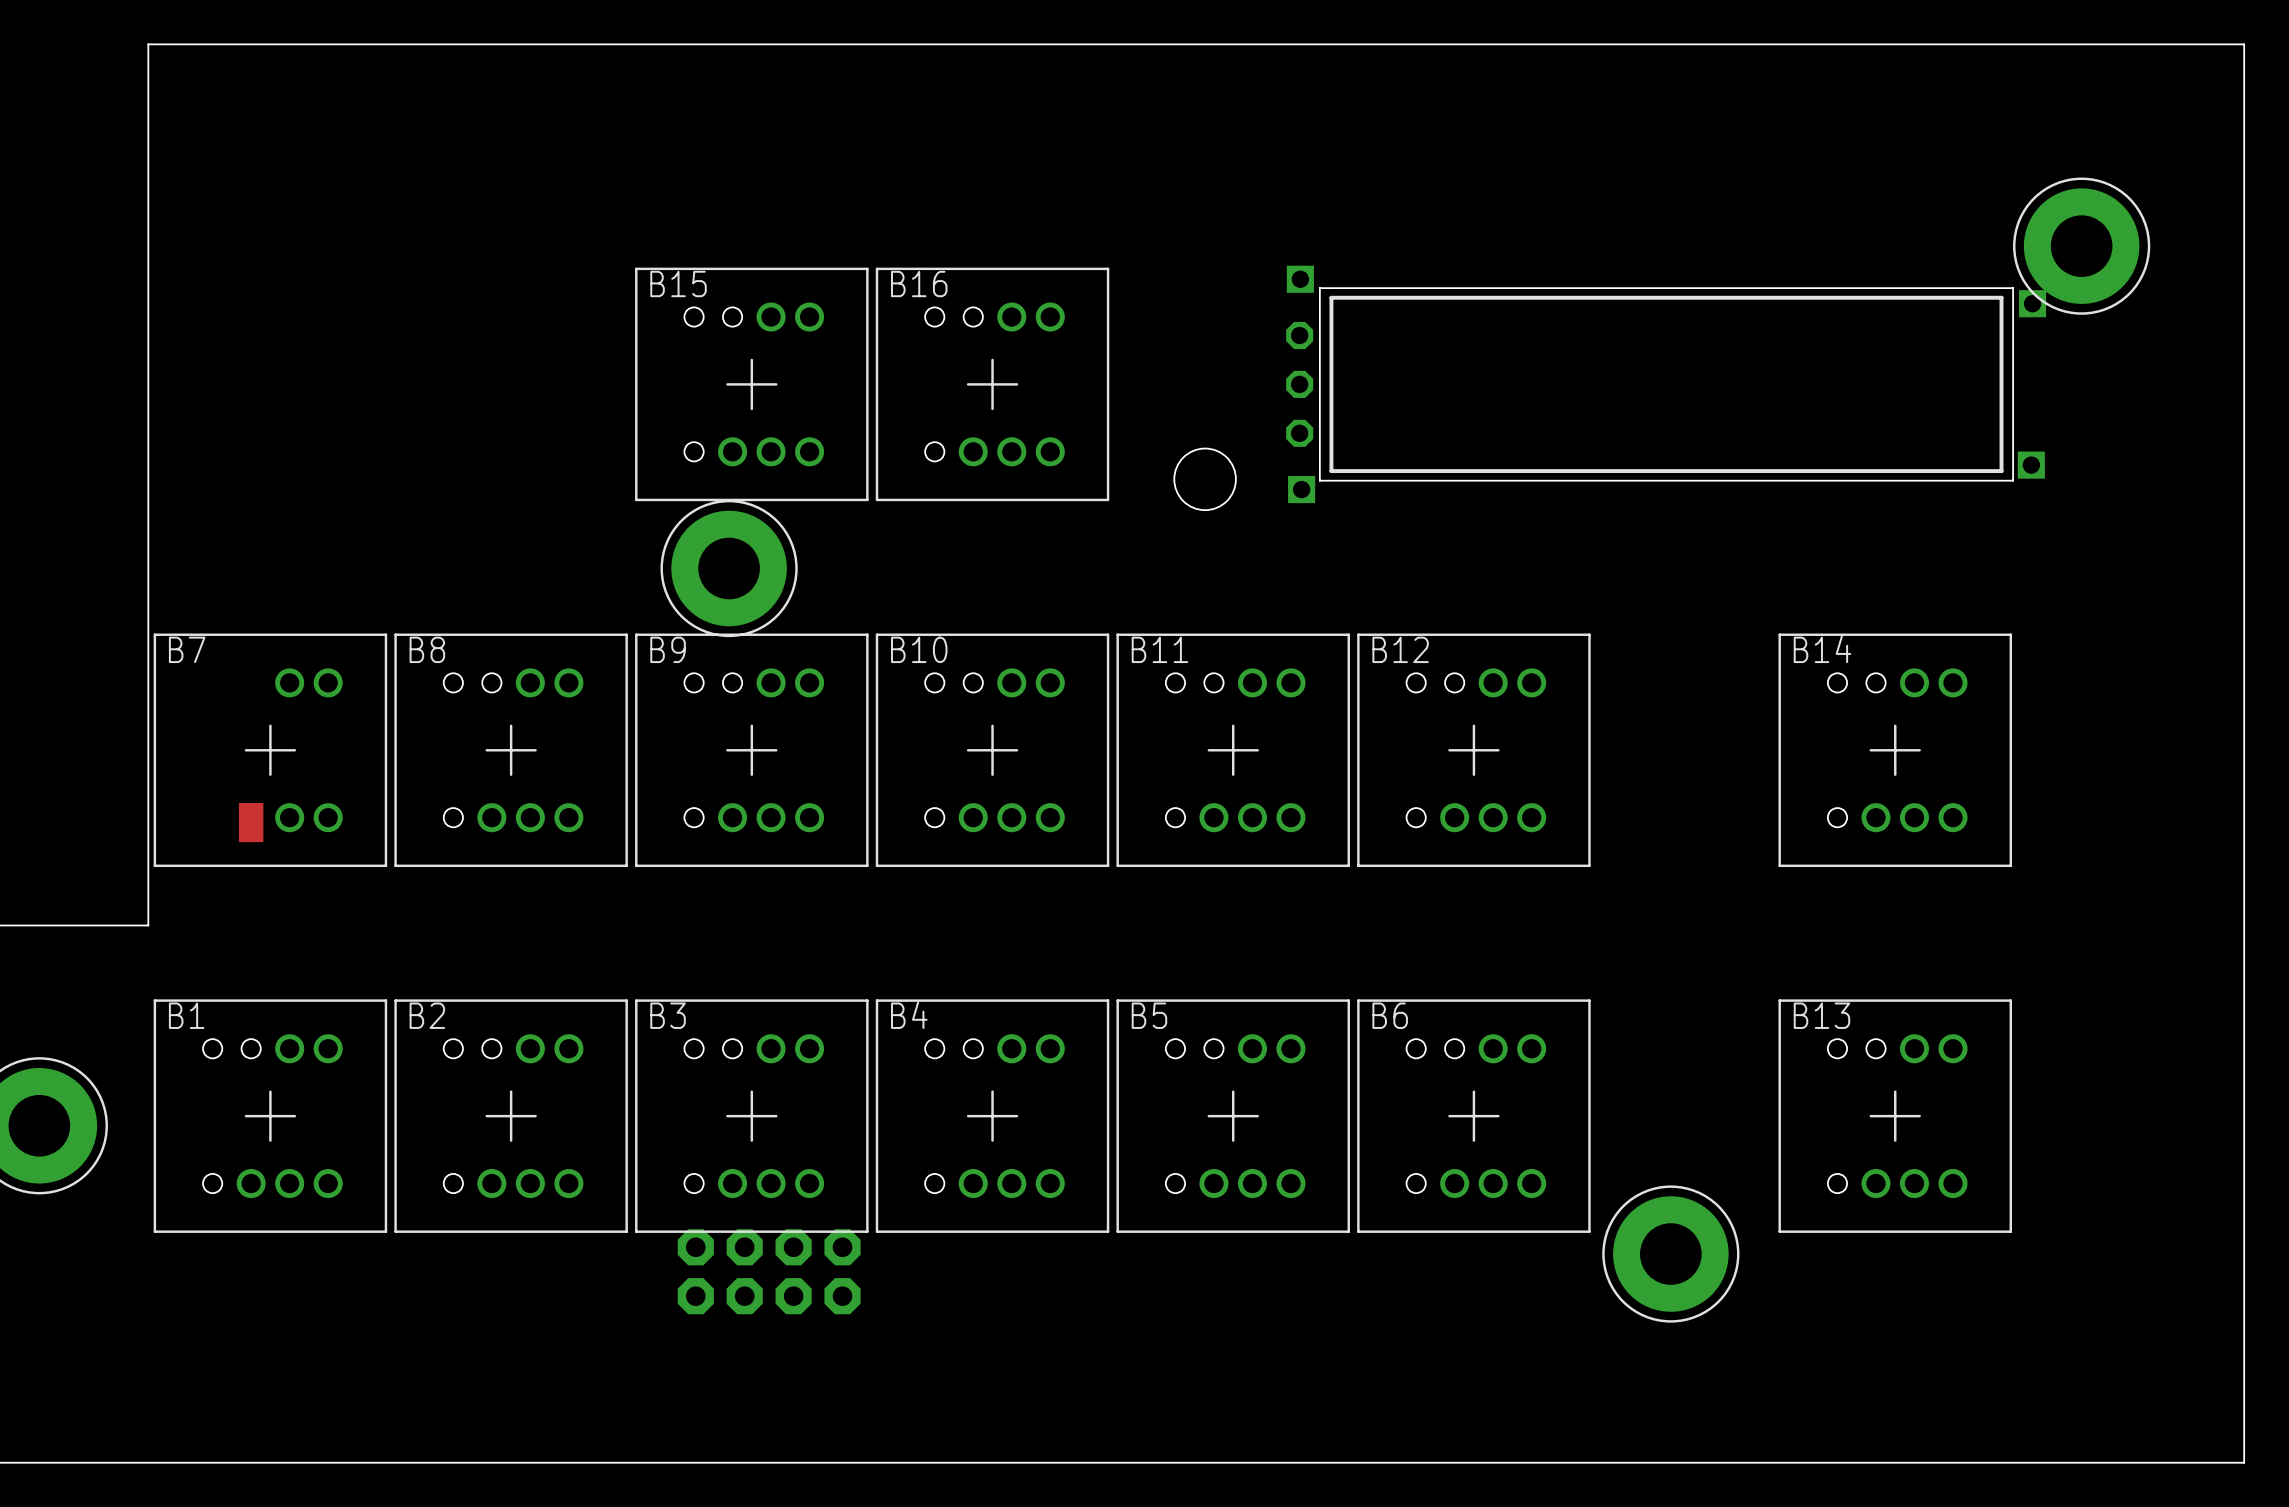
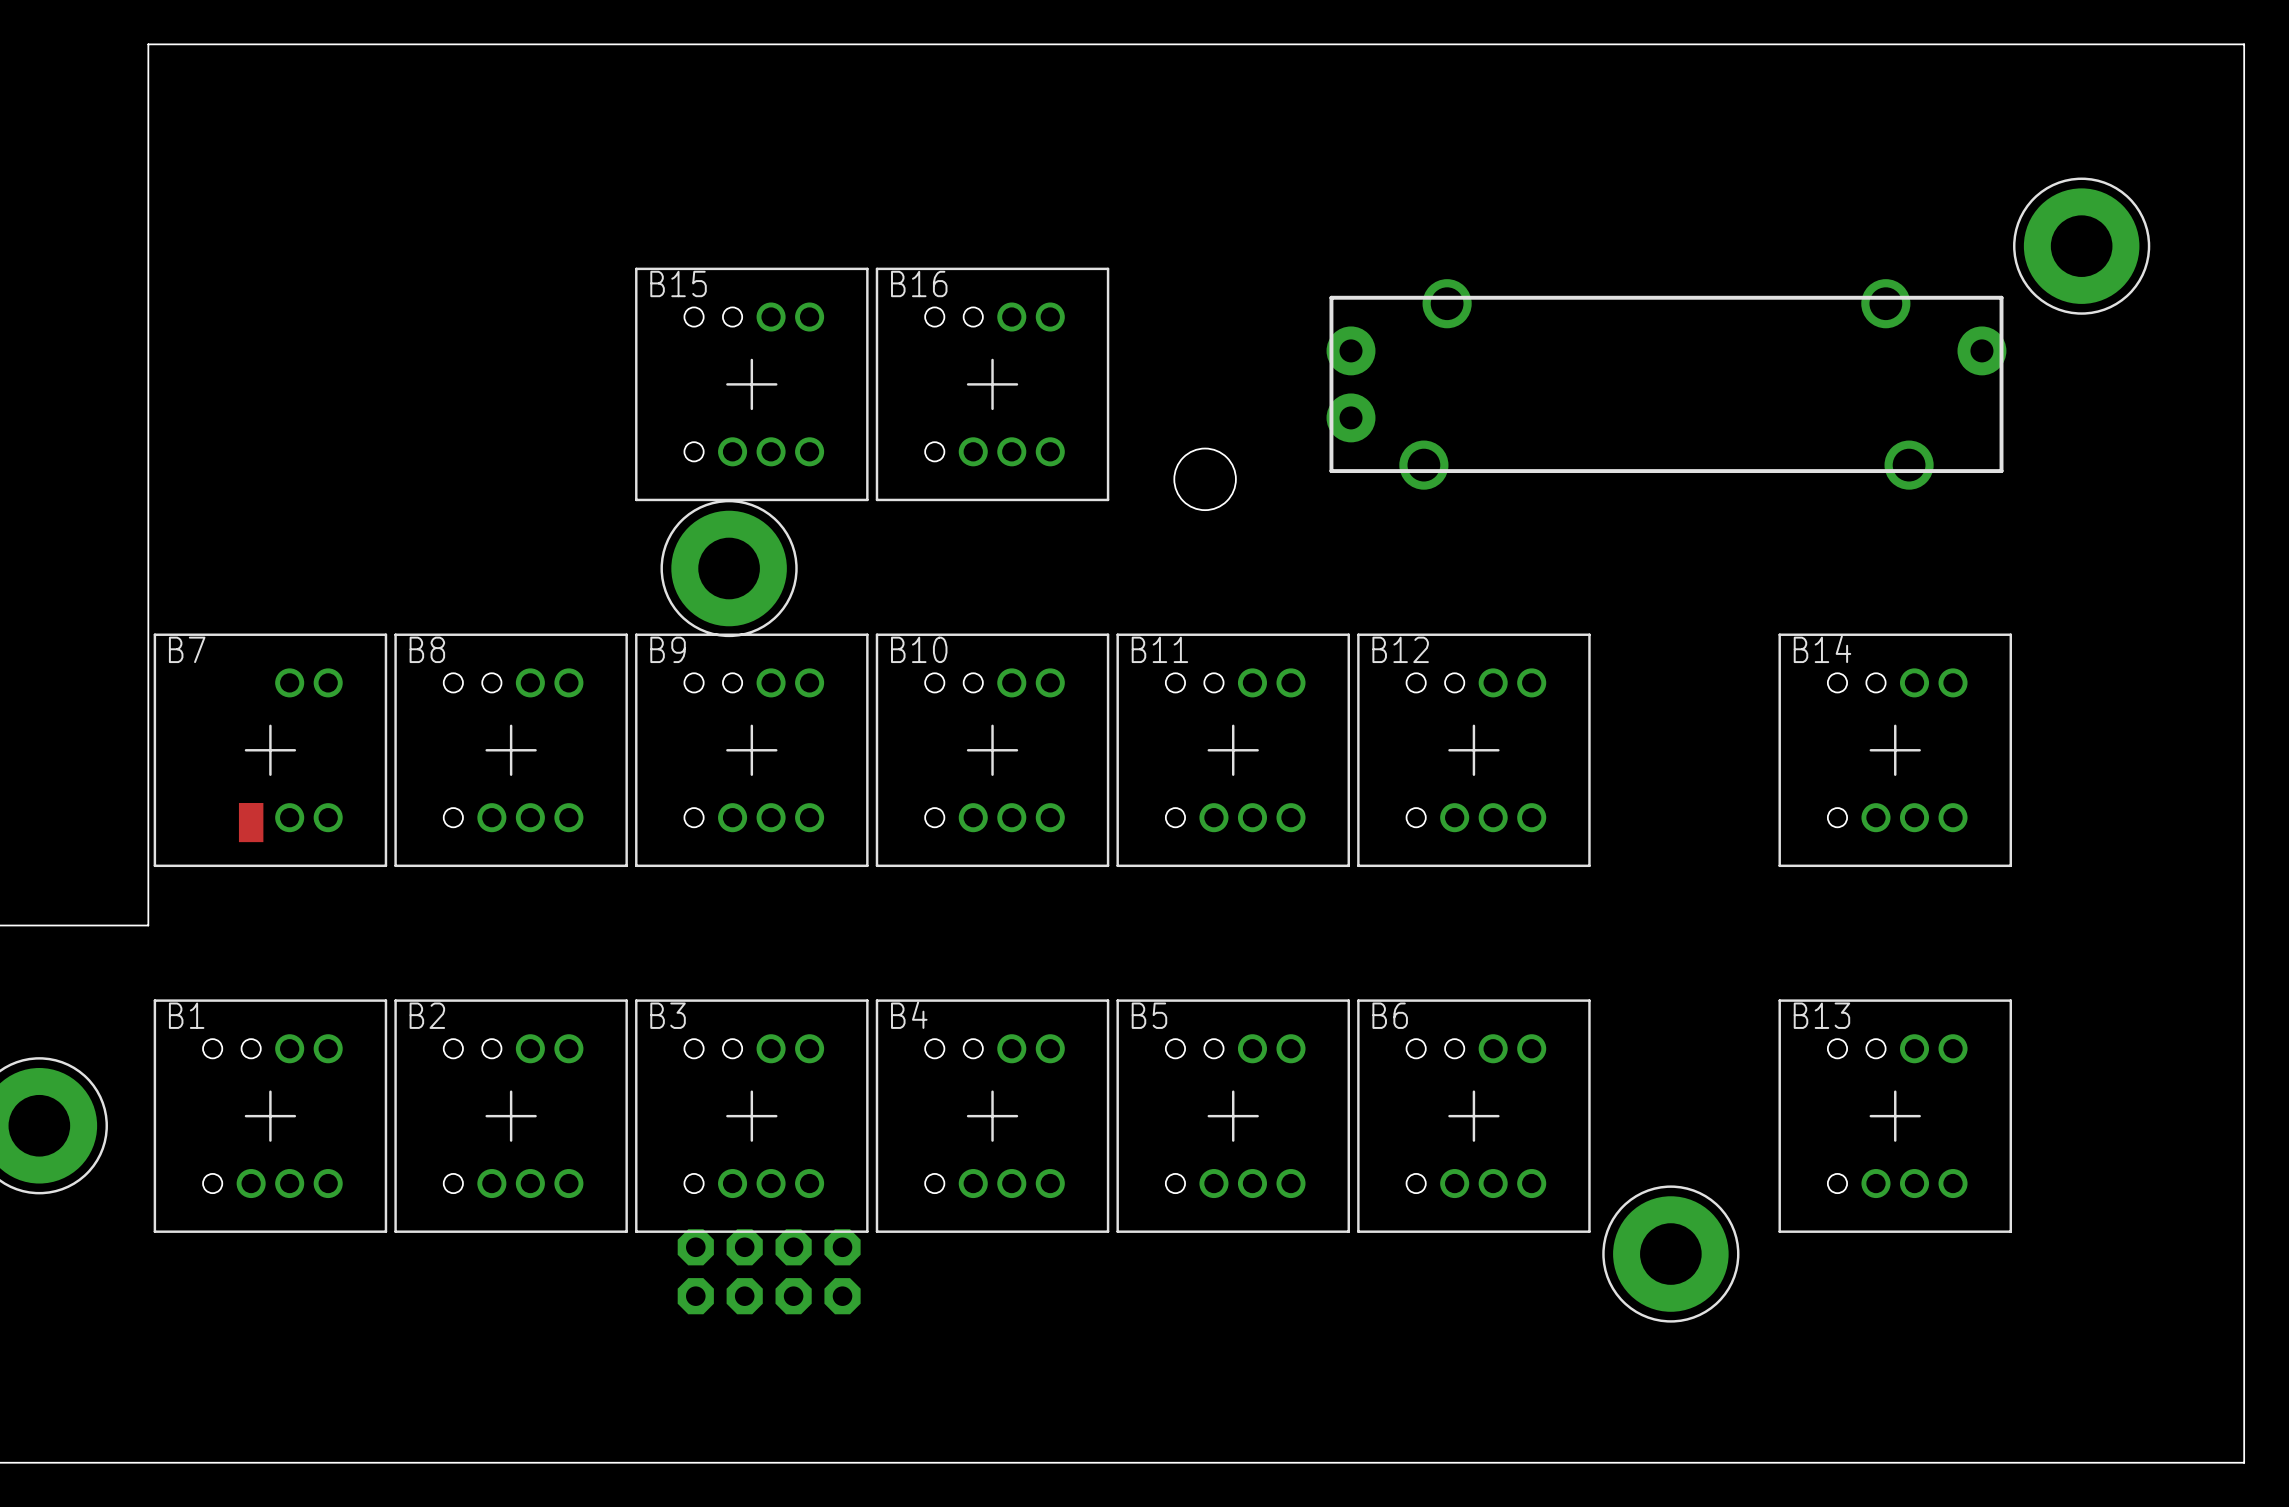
part footprint: [1286, 265, 2047, 504] -> [1326, 279, 2007, 490]
board edge: (1319, 288) (2013, 288) (2013, 480) (1319, 480) (1319, 288) -> none

